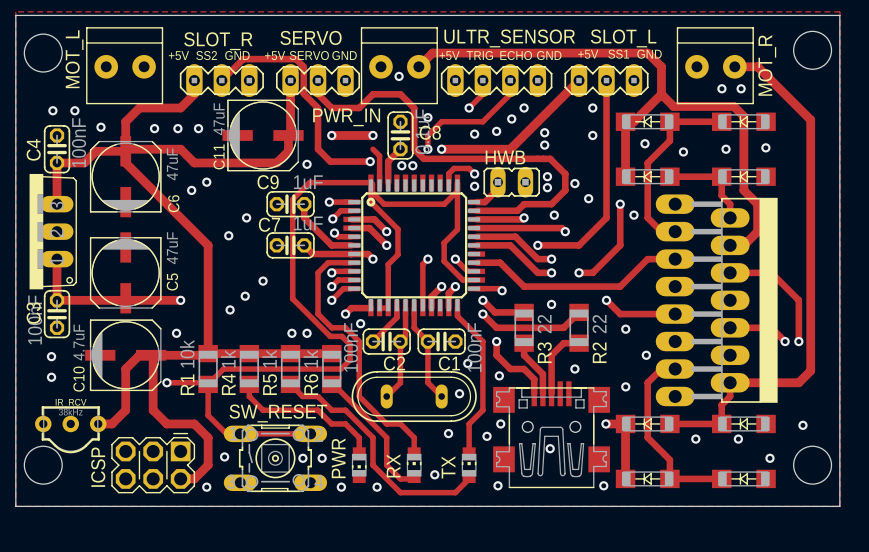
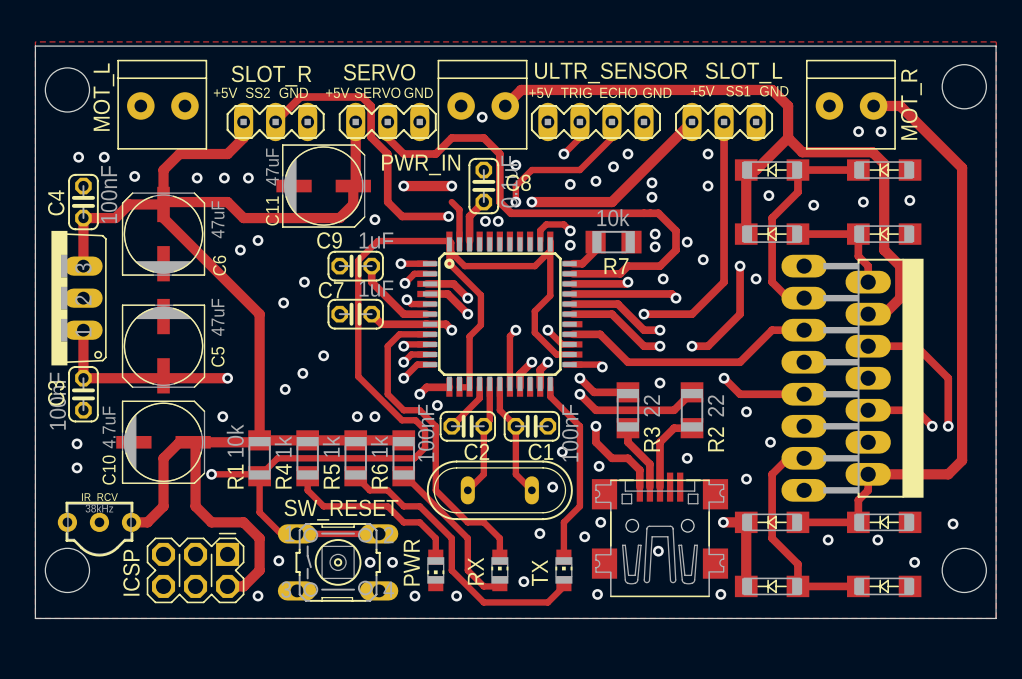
HWB: (511, 182) -> none
R7: none -> 10k (613, 242)

